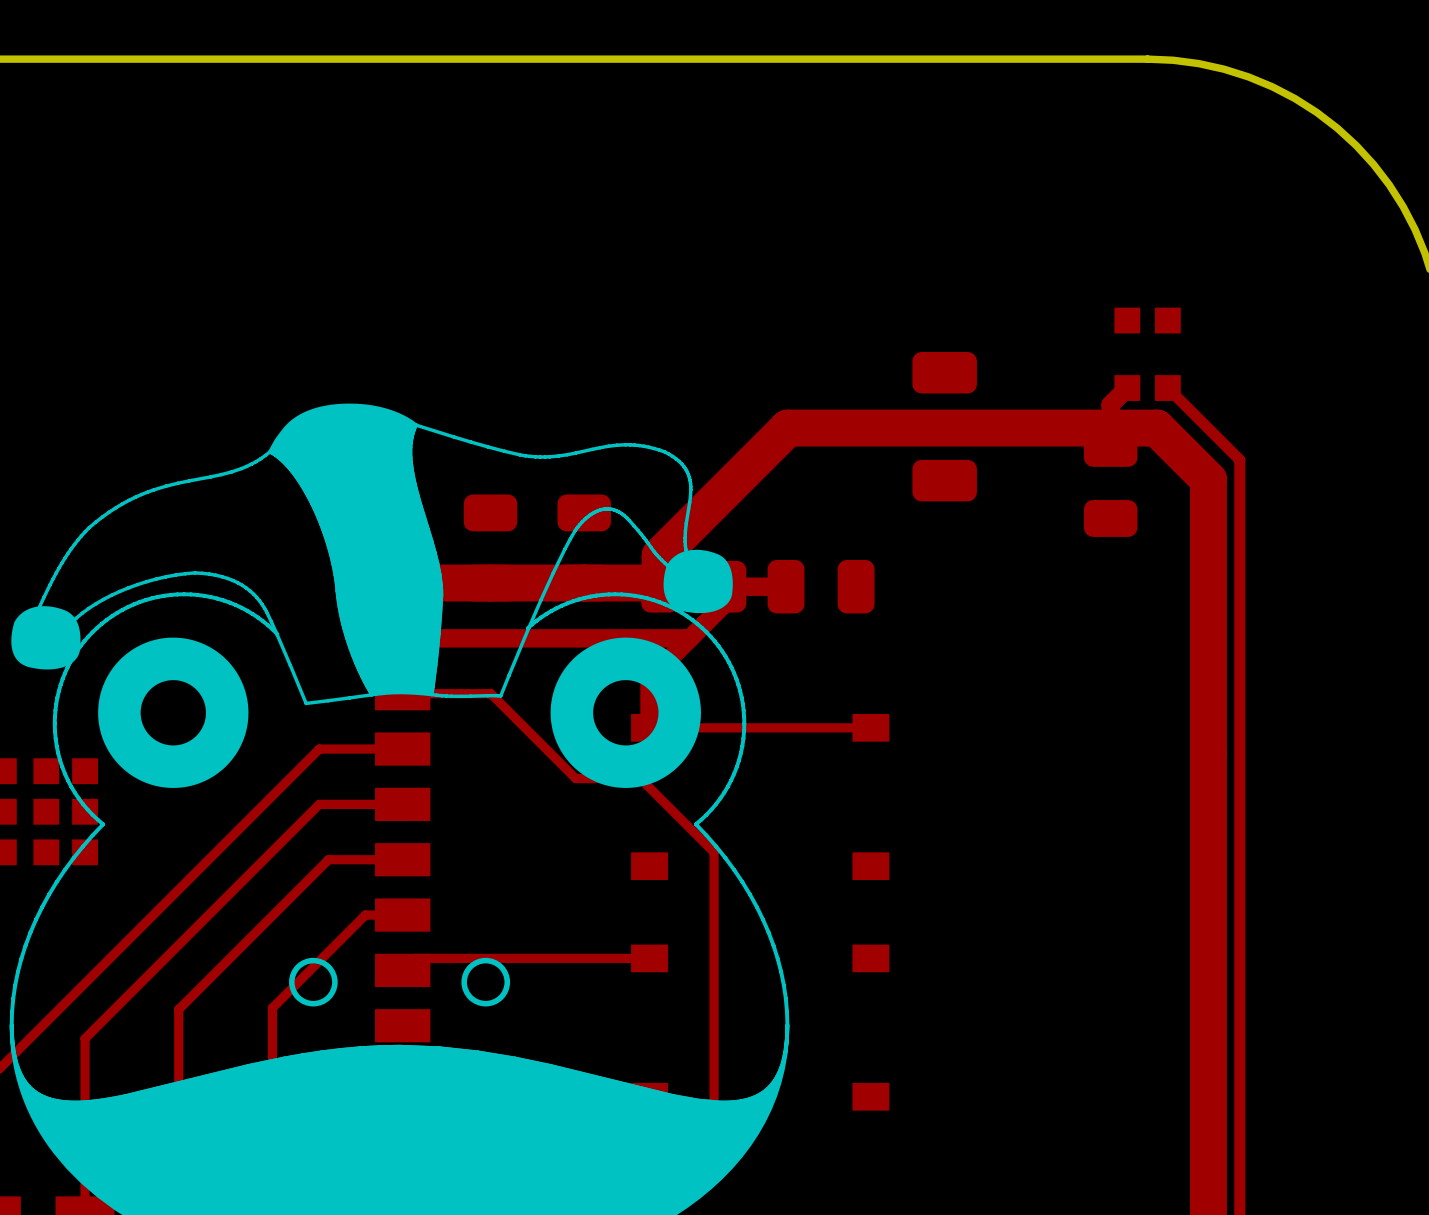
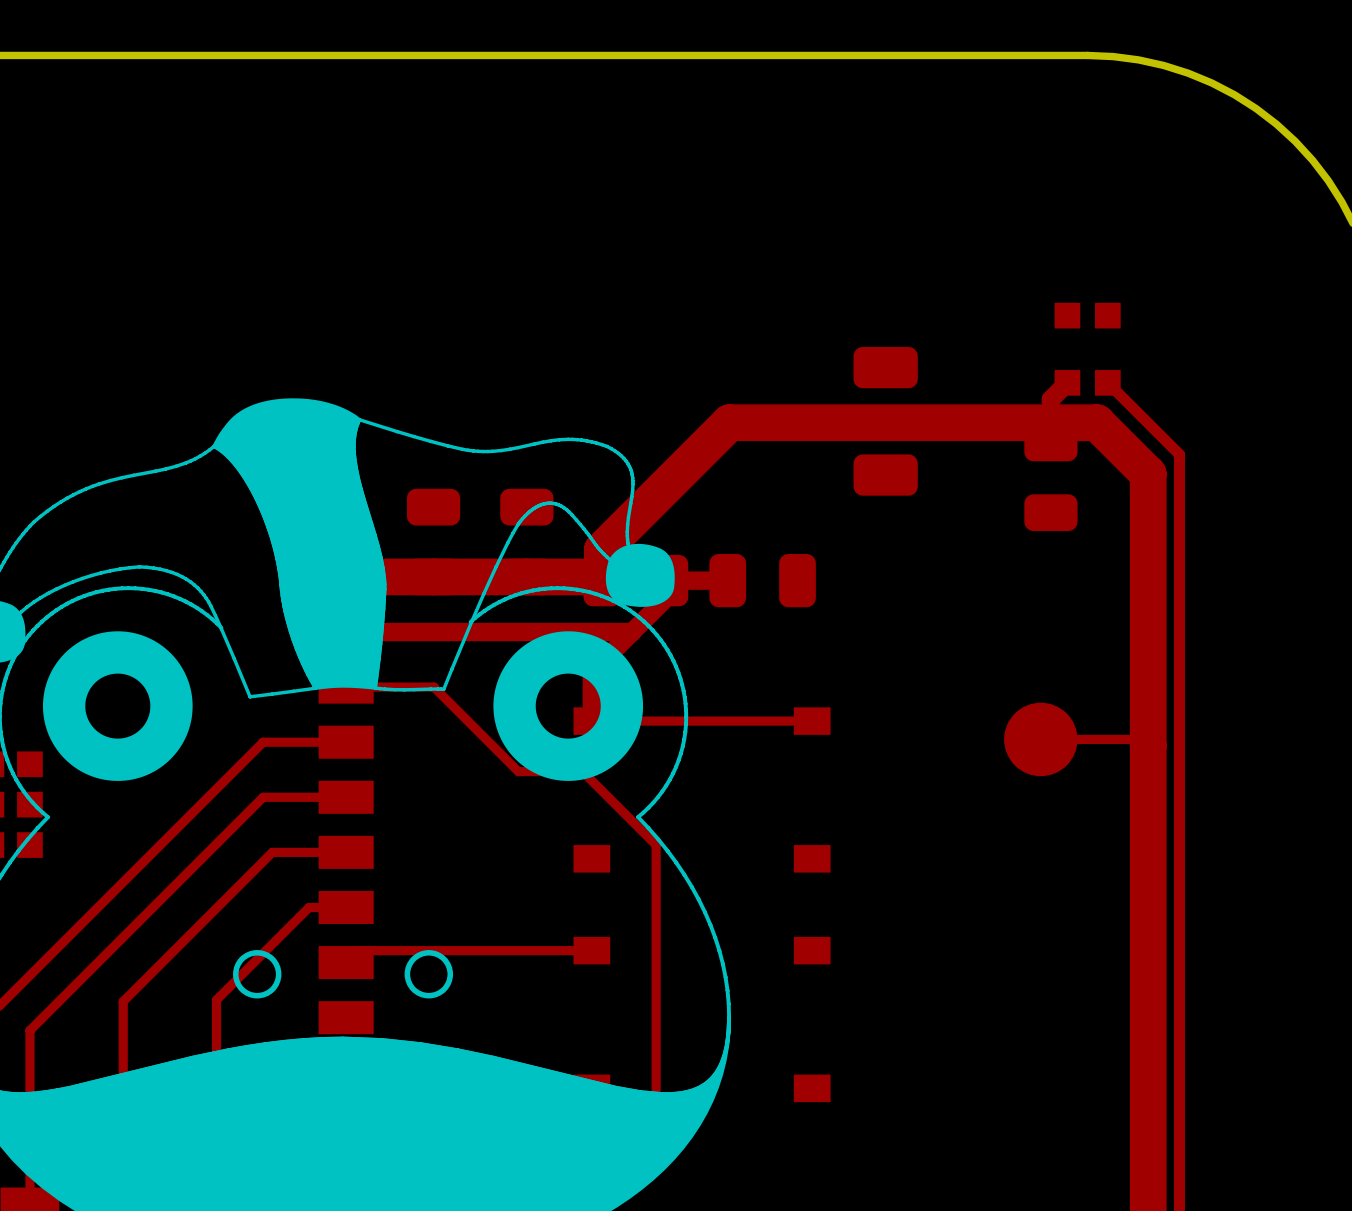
top track: none -> (1040, 739) (1141, 739) (1148, 745)
part: none -> (1040, 739)

